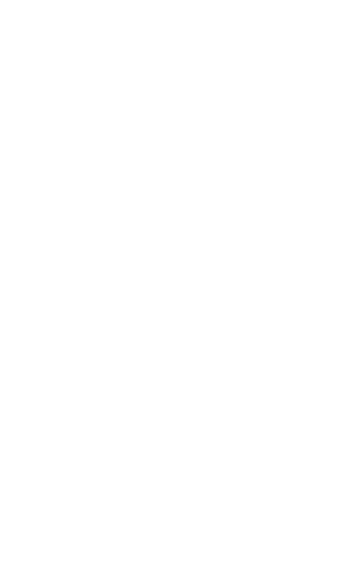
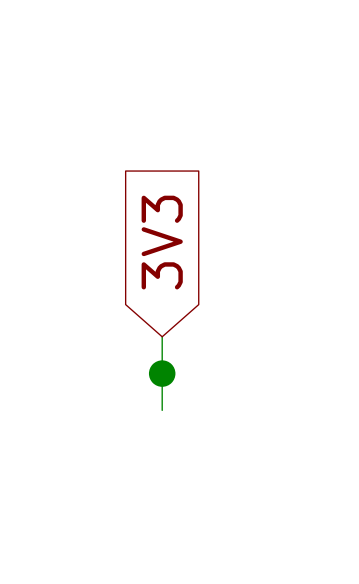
global label: none -> 3V3 (162, 242)
wire: none -> (162, 336) (162, 410)
junction: none -> (162, 373)

